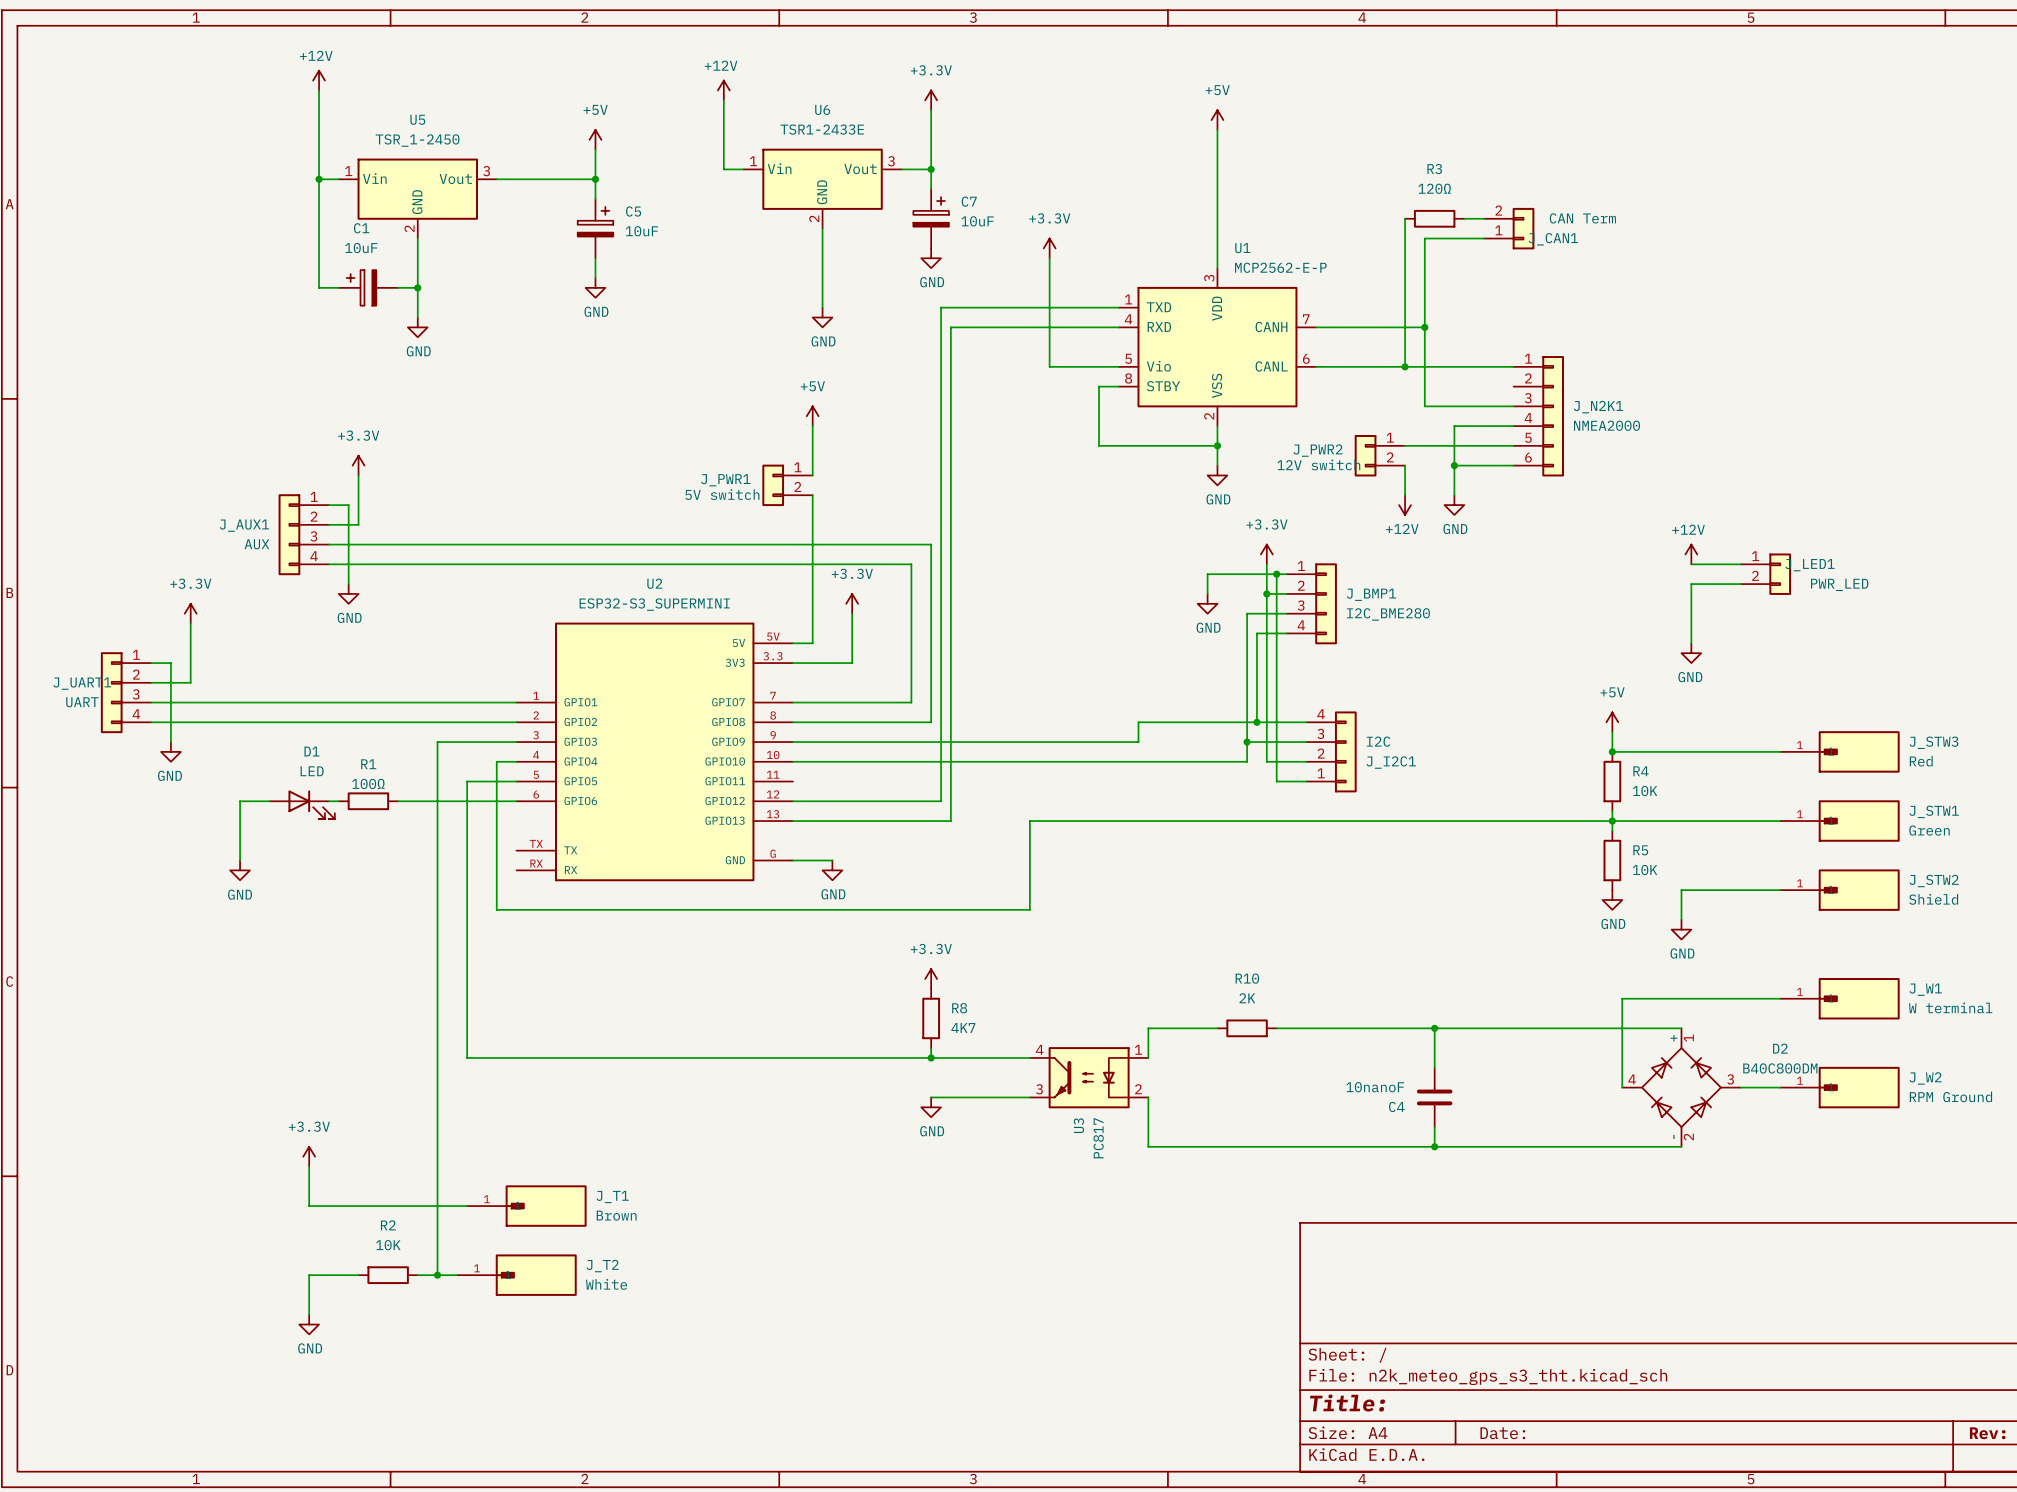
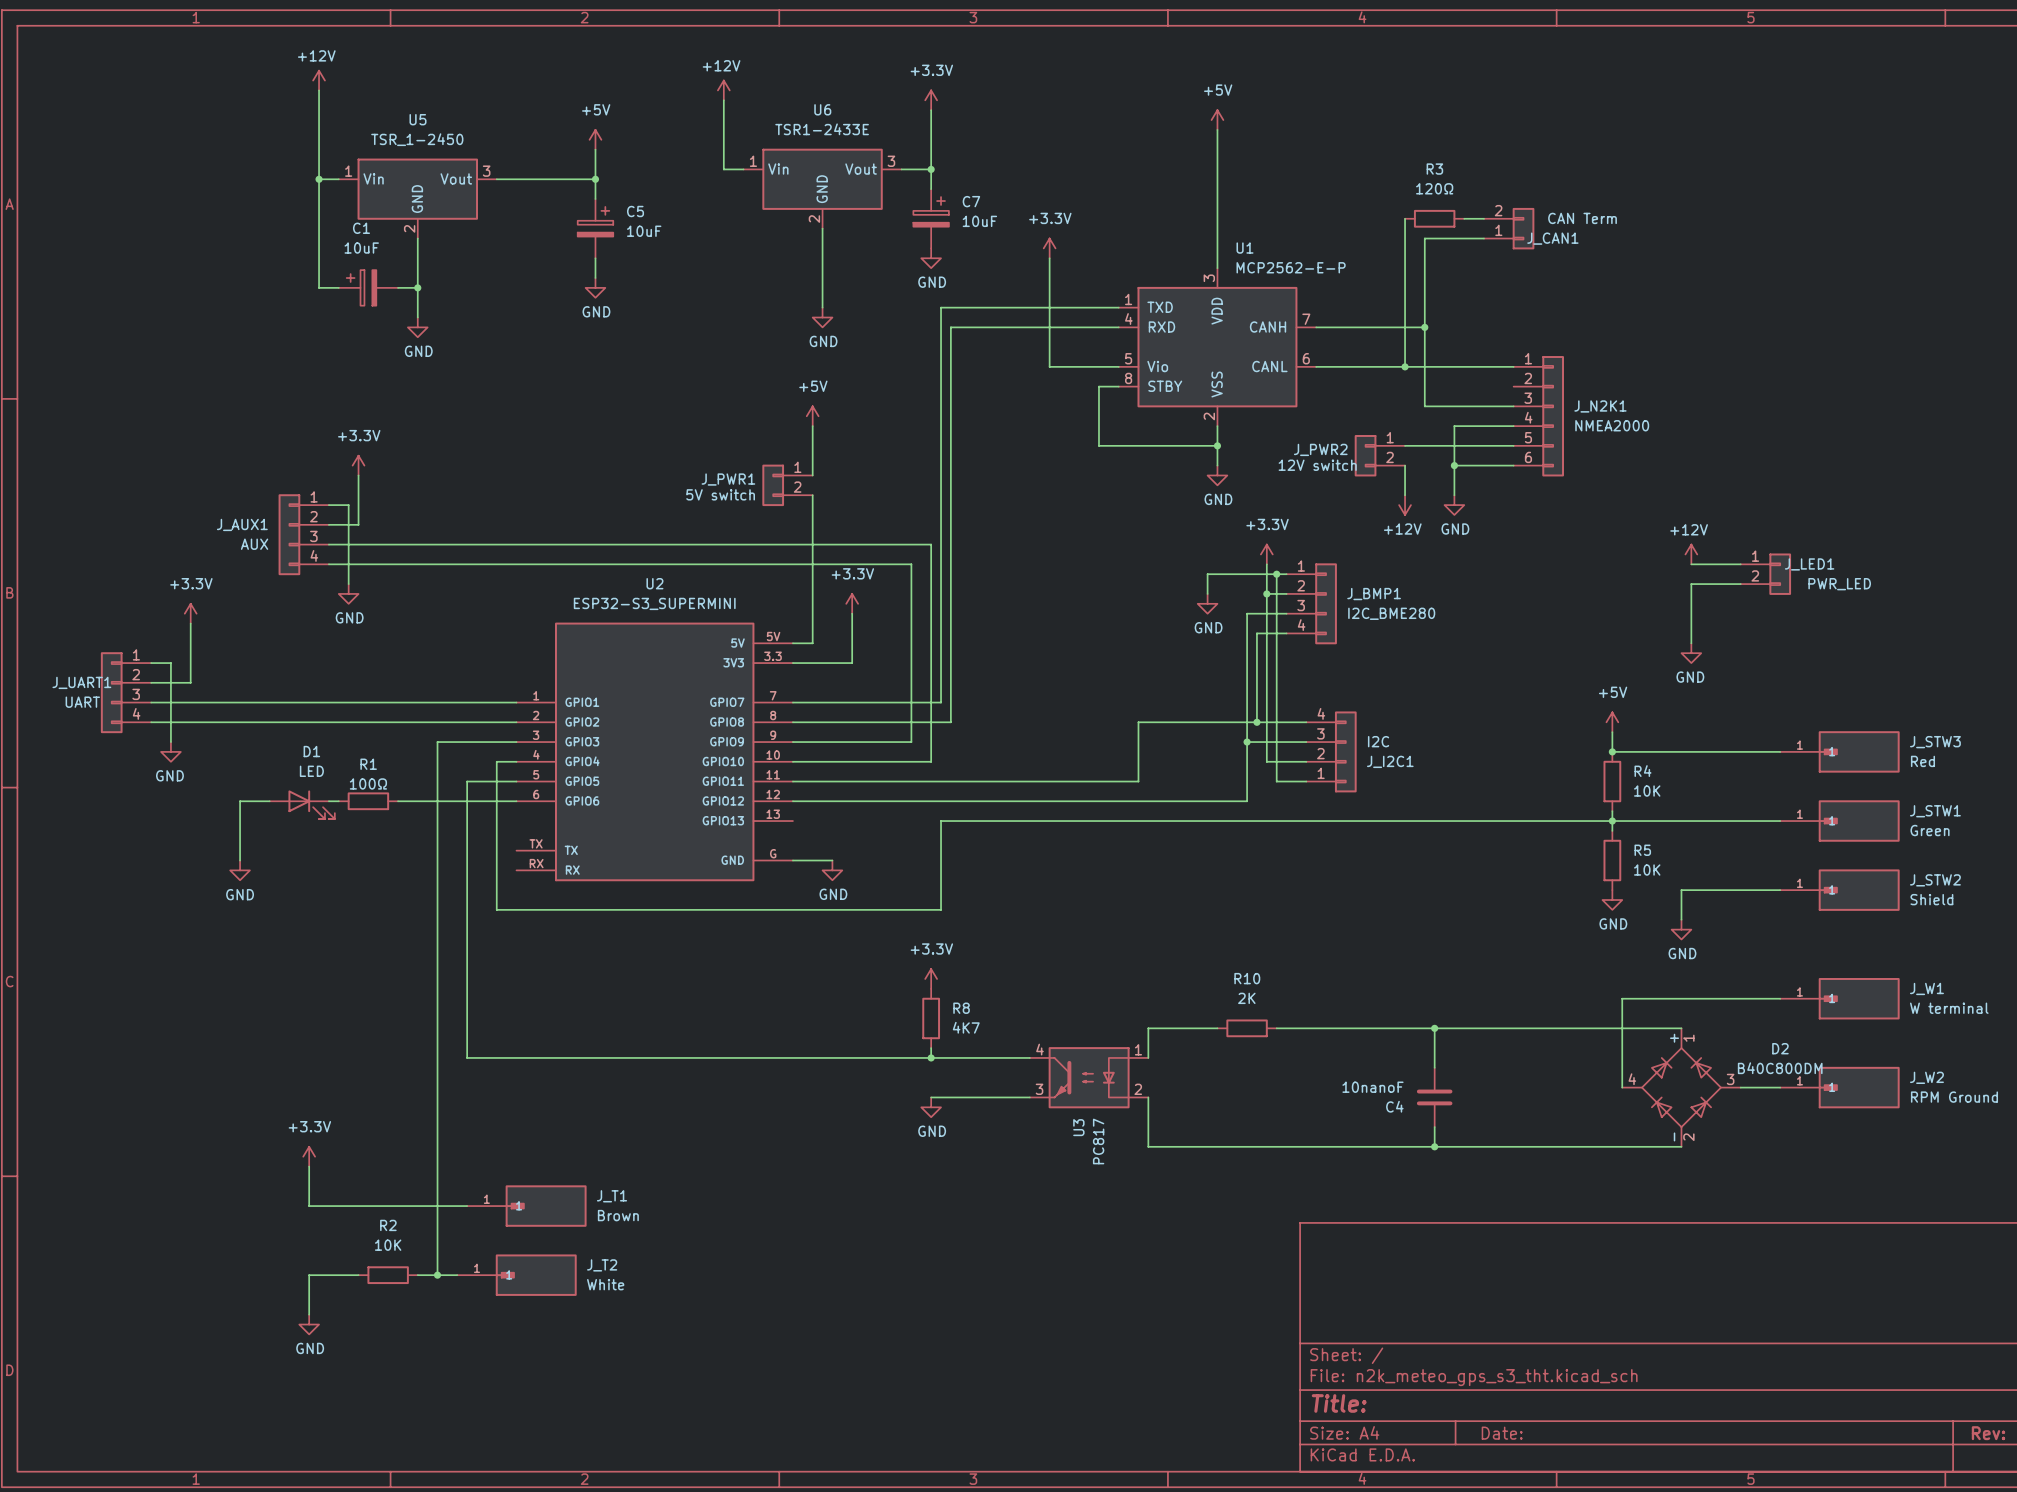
wire: (941, 702) (941, 801) -> (941, 702) (911, 702) (911, 742)
wire: (950, 722) (950, 821) -> (950, 722) (931, 722) (931, 761)
wire: (911, 742) (1138, 742) -> (792, 781) (1138, 781) (1138, 742)
wire: (931, 761) (1247, 761) -> (941, 801) (1247, 801) (1247, 761)
wire: (792, 821) (941, 821) -> none
wire: none -> (950, 821) (1029, 821)
wire: (1029, 821) (1029, 909) (941, 909) -> (941, 821) (941, 909)

